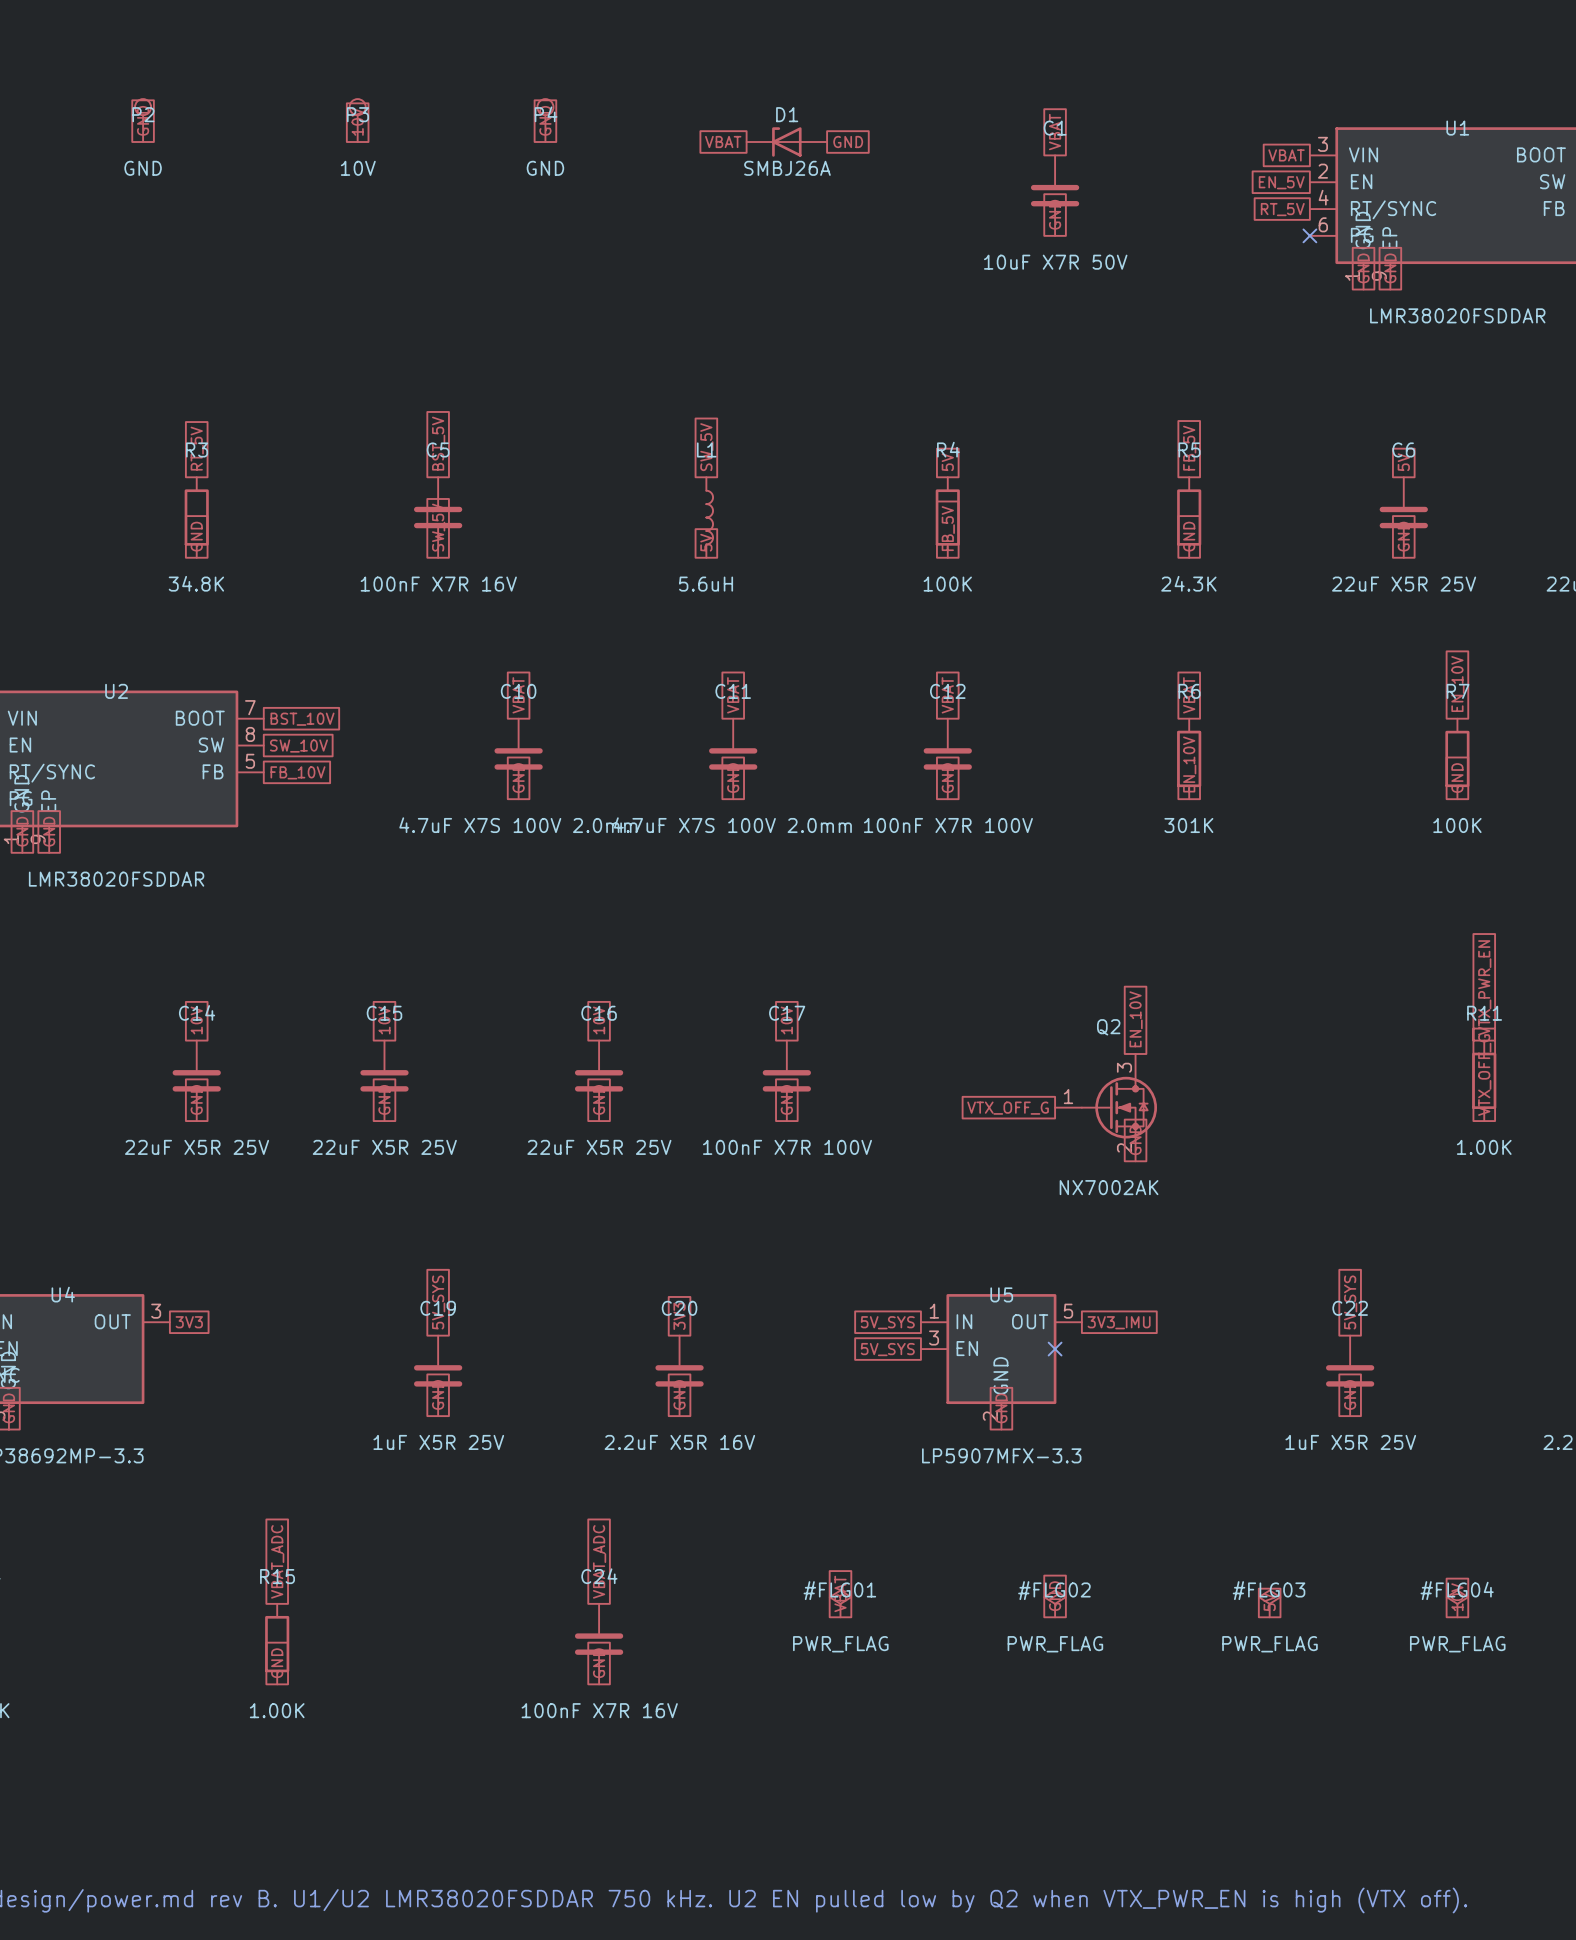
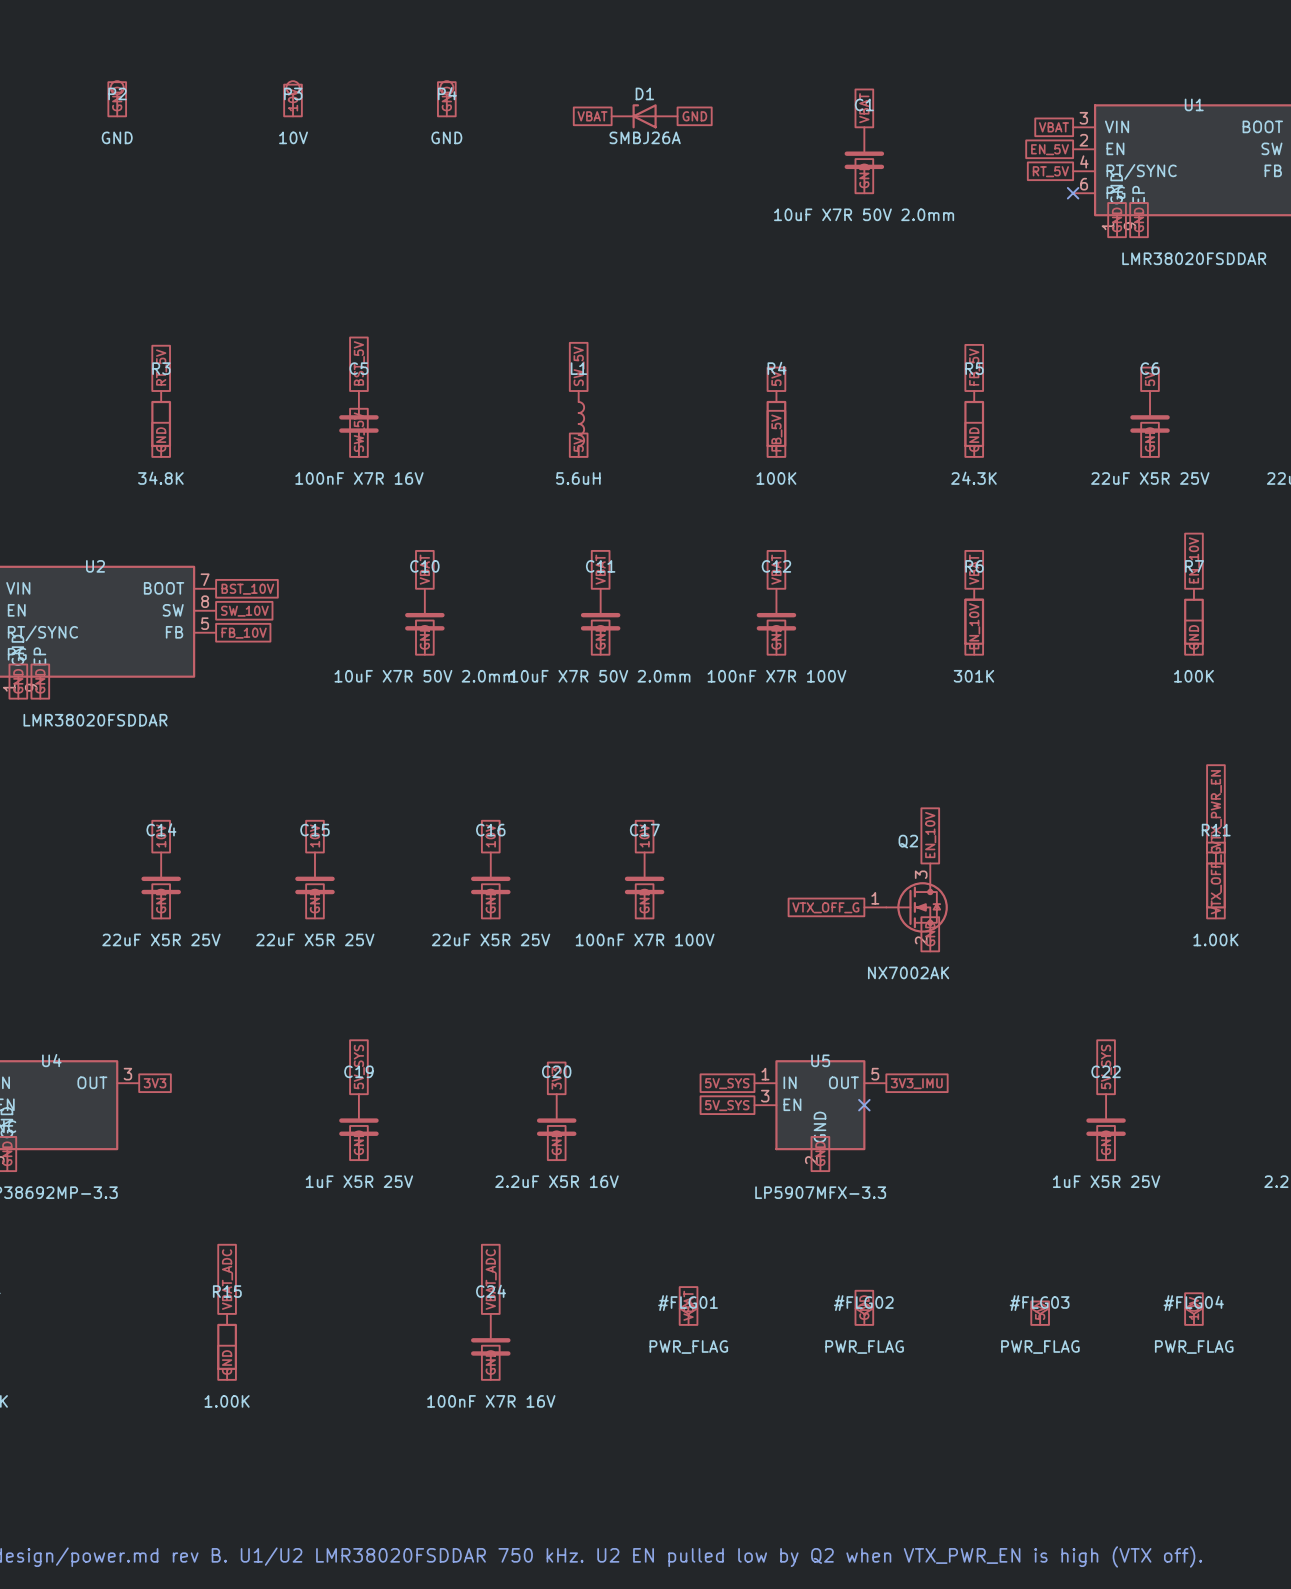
C1 value: 10uF X7R 50V (1055, 262) -> 10uF X7R 50V 2.0mm (864, 214)
C10 value: 4.7uF X7S 100V 2.0mm (518, 825) -> 10uF X7R 50V 2.0mm (424, 676)
C11 value: 4.7uF X7S 100V 2.0mm (732, 825) -> 10uF X7R 50V 2.0mm (600, 676)

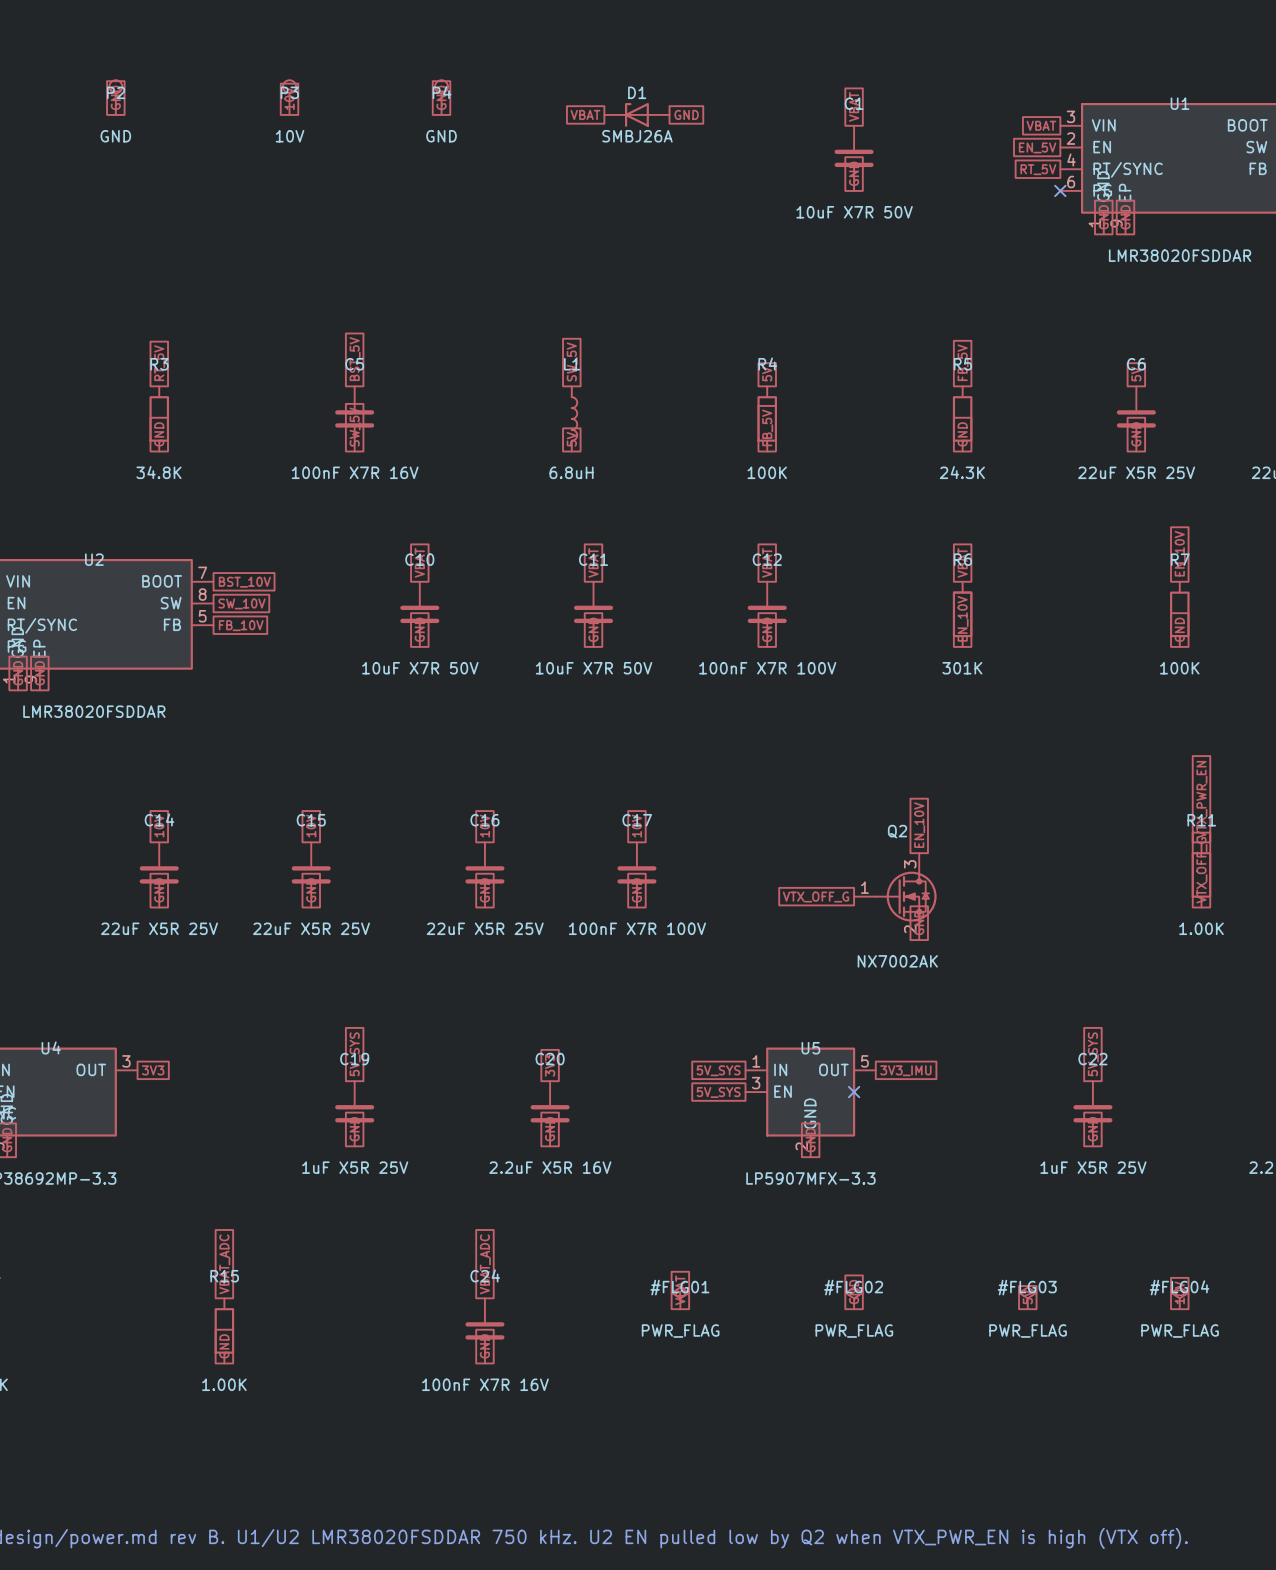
C1 value: 10uF X7R 50V 2.0mm (864, 214) -> 10uF X7R 50V (854, 212)
L1 value: 5.6uH (578, 478) -> 6.8uH (571, 472)
C10 value: 10uF X7R 50V 2.0mm (424, 676) -> 10uF X7R 50V (420, 668)
C11 value: 10uF X7R 50V 2.0mm (600, 676) -> 10uF X7R 50V (594, 668)

